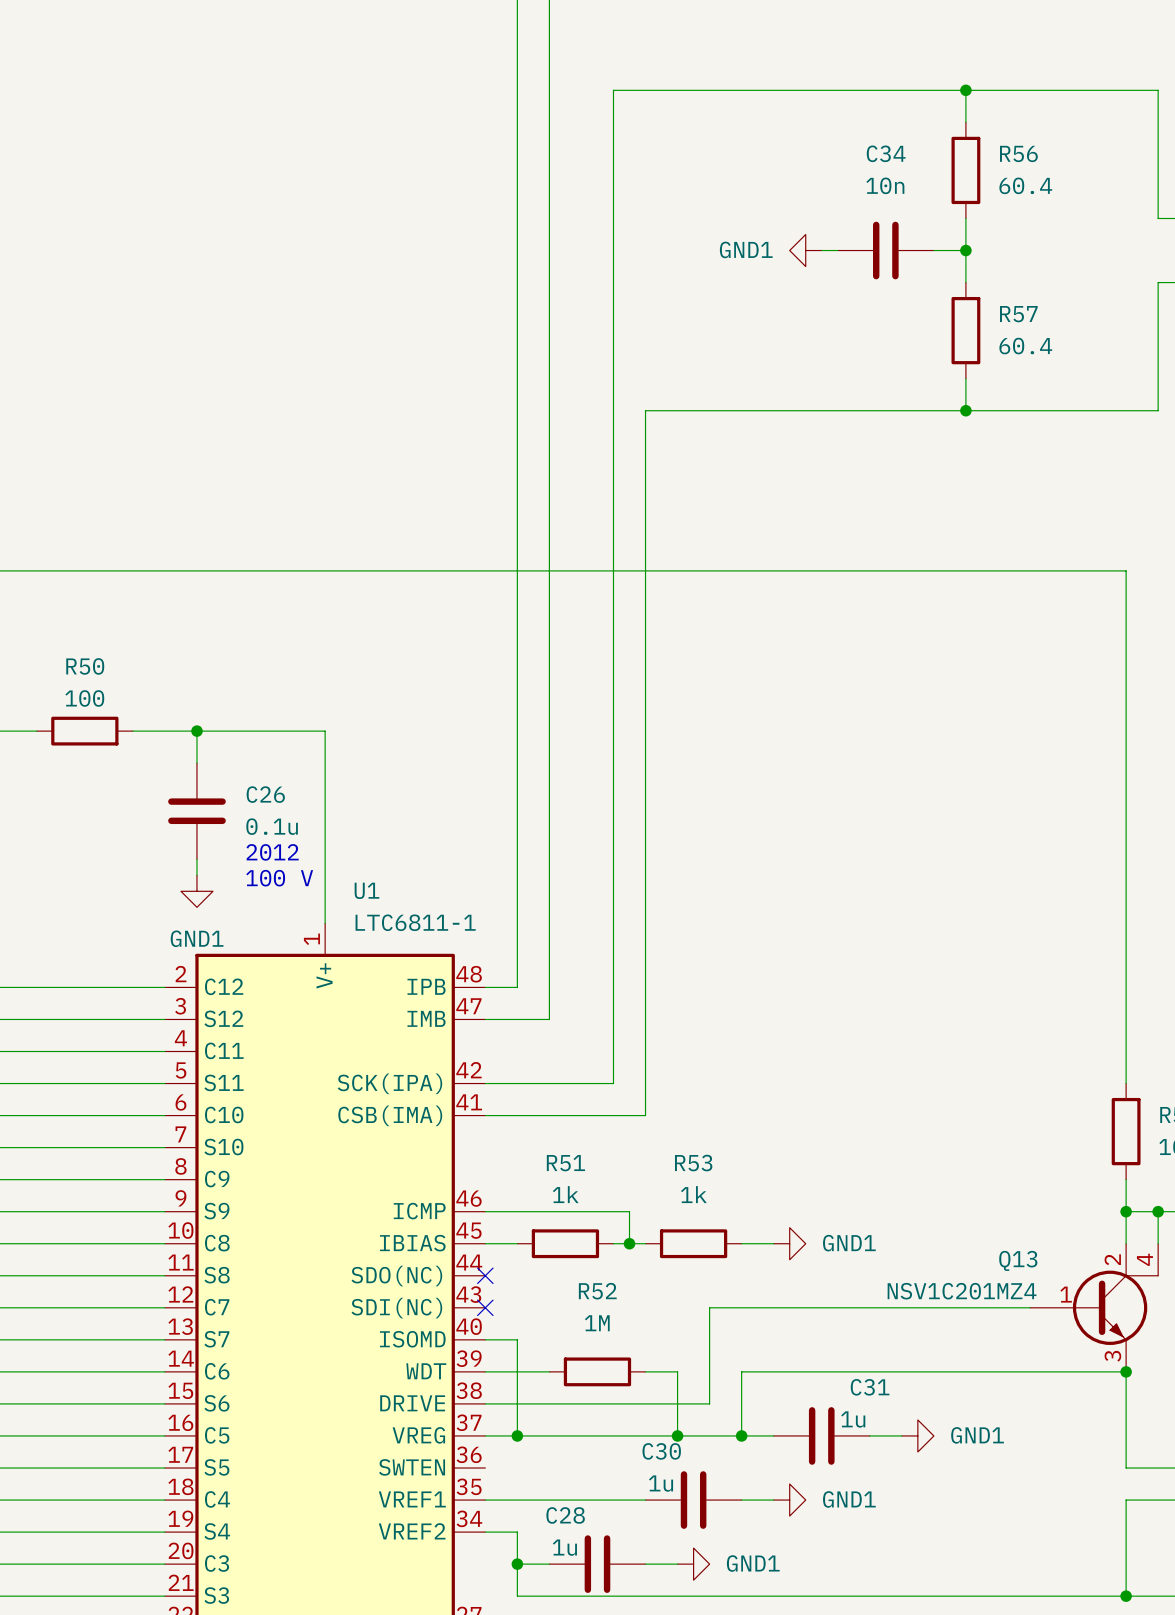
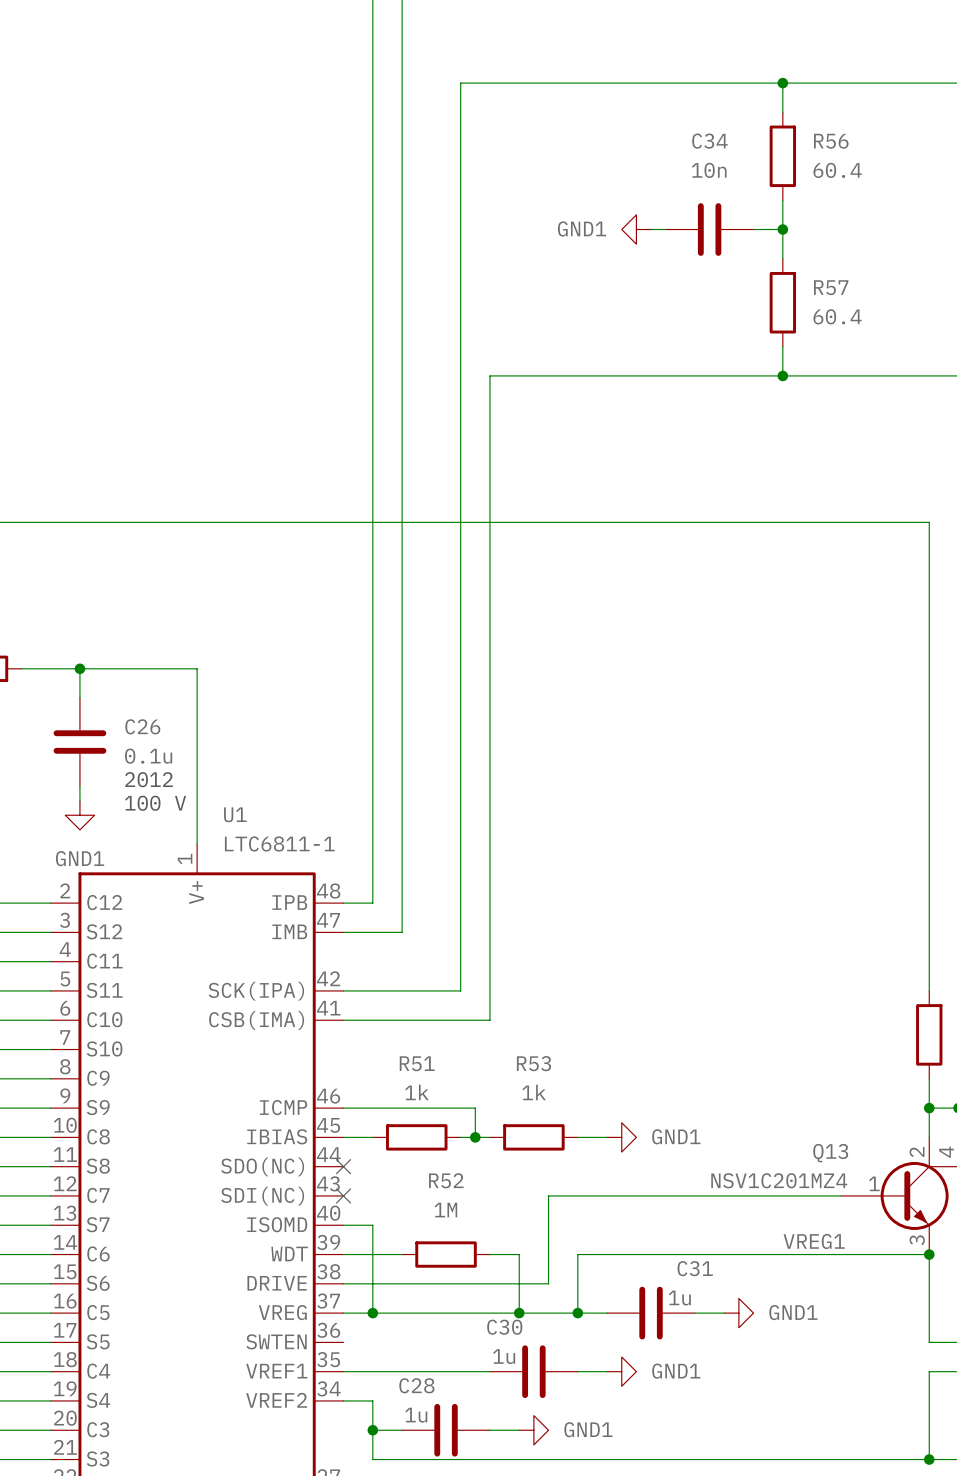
label: none -> VREG1 (814, 1241)

